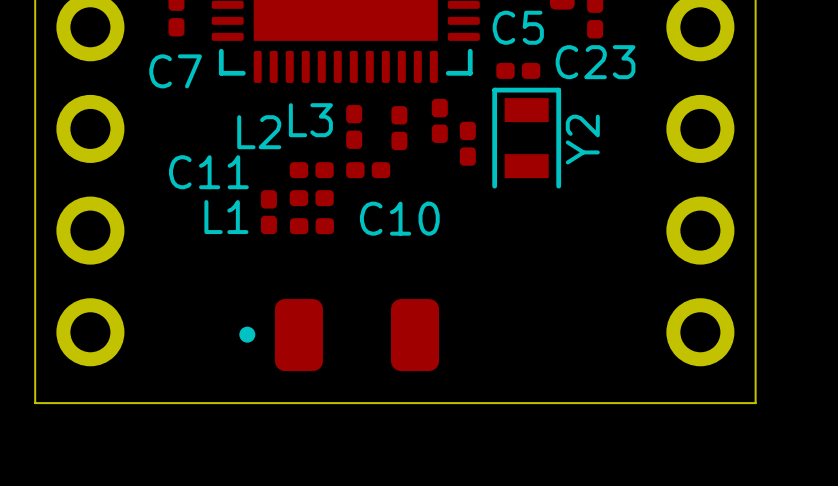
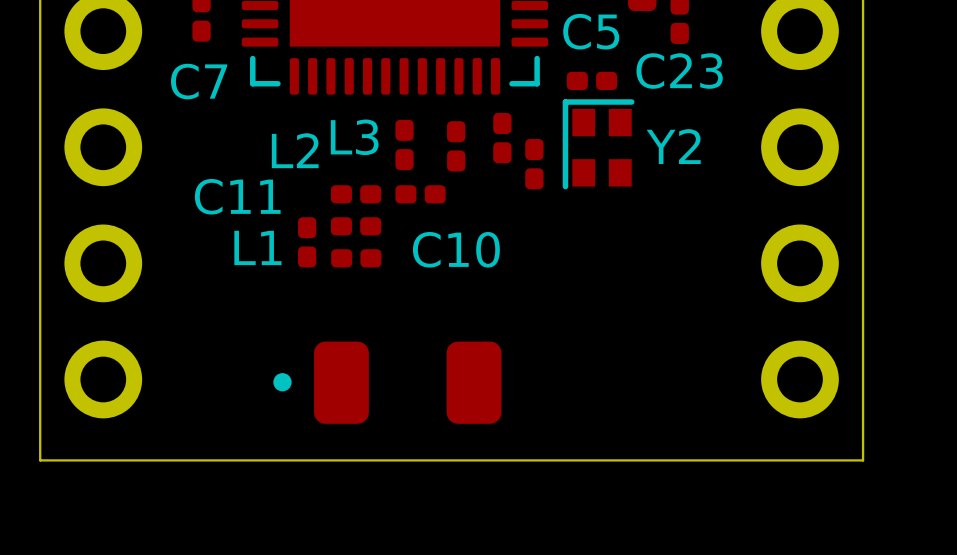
Y2 footprint: [492, 87, 562, 189] -> [562, 99, 635, 190]

